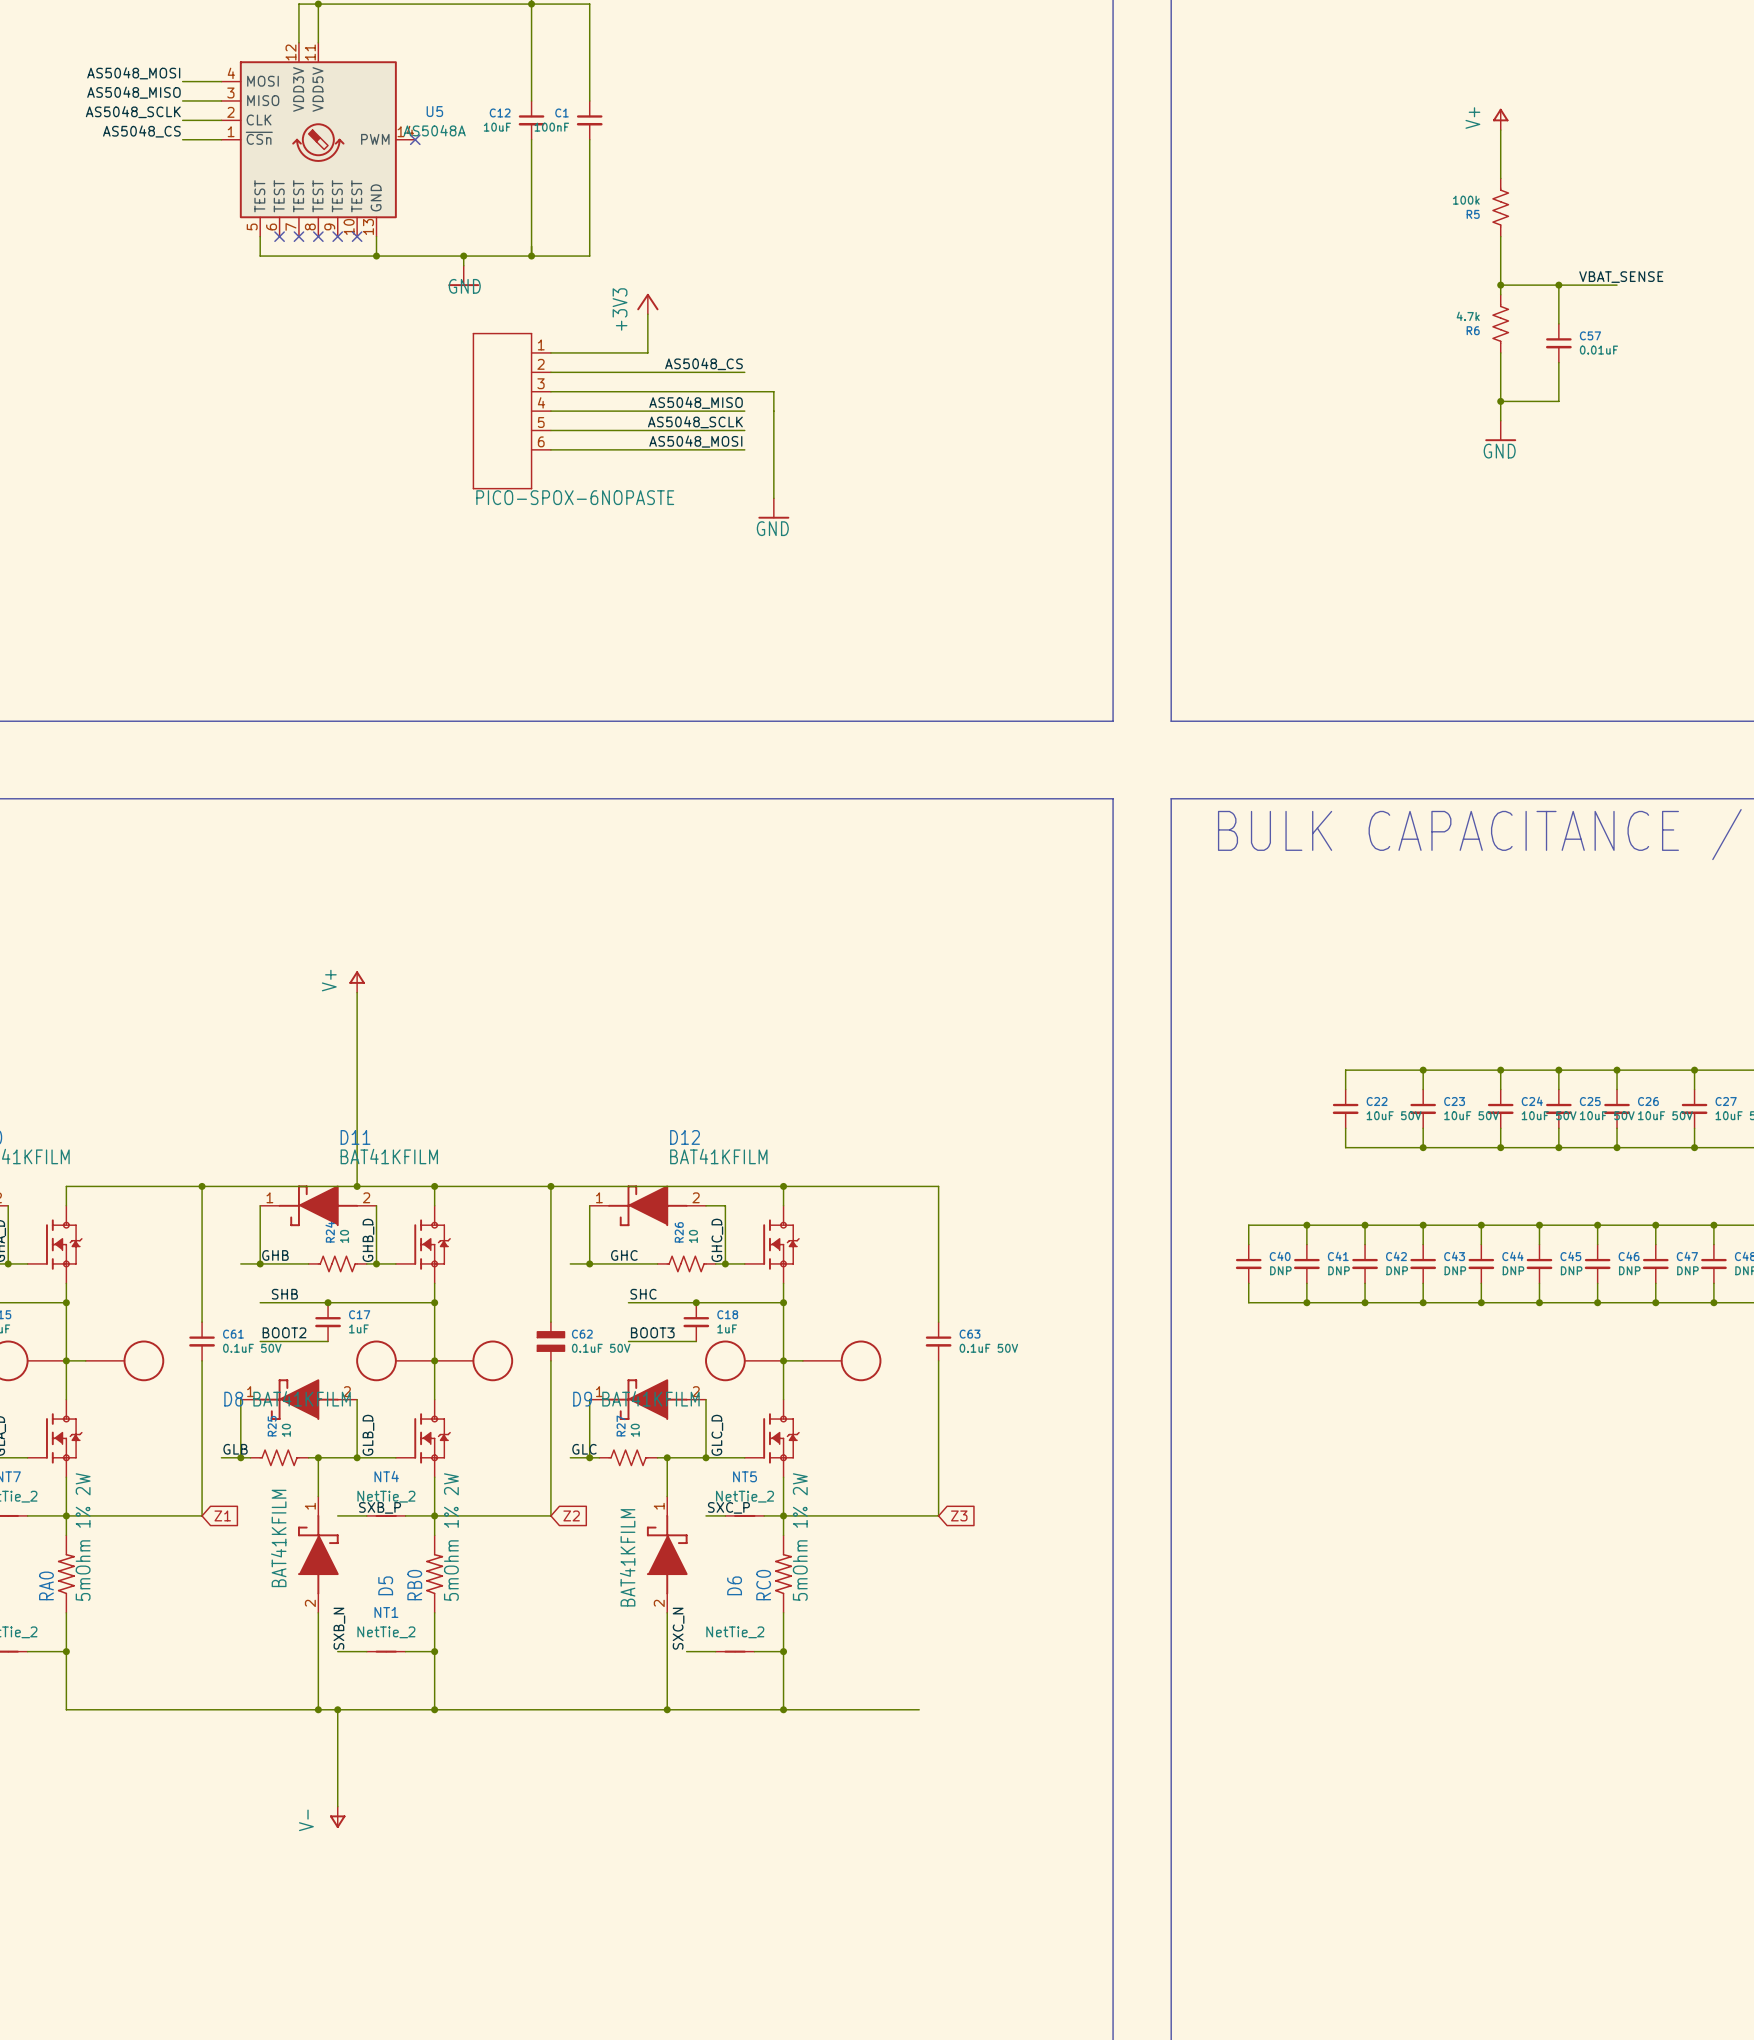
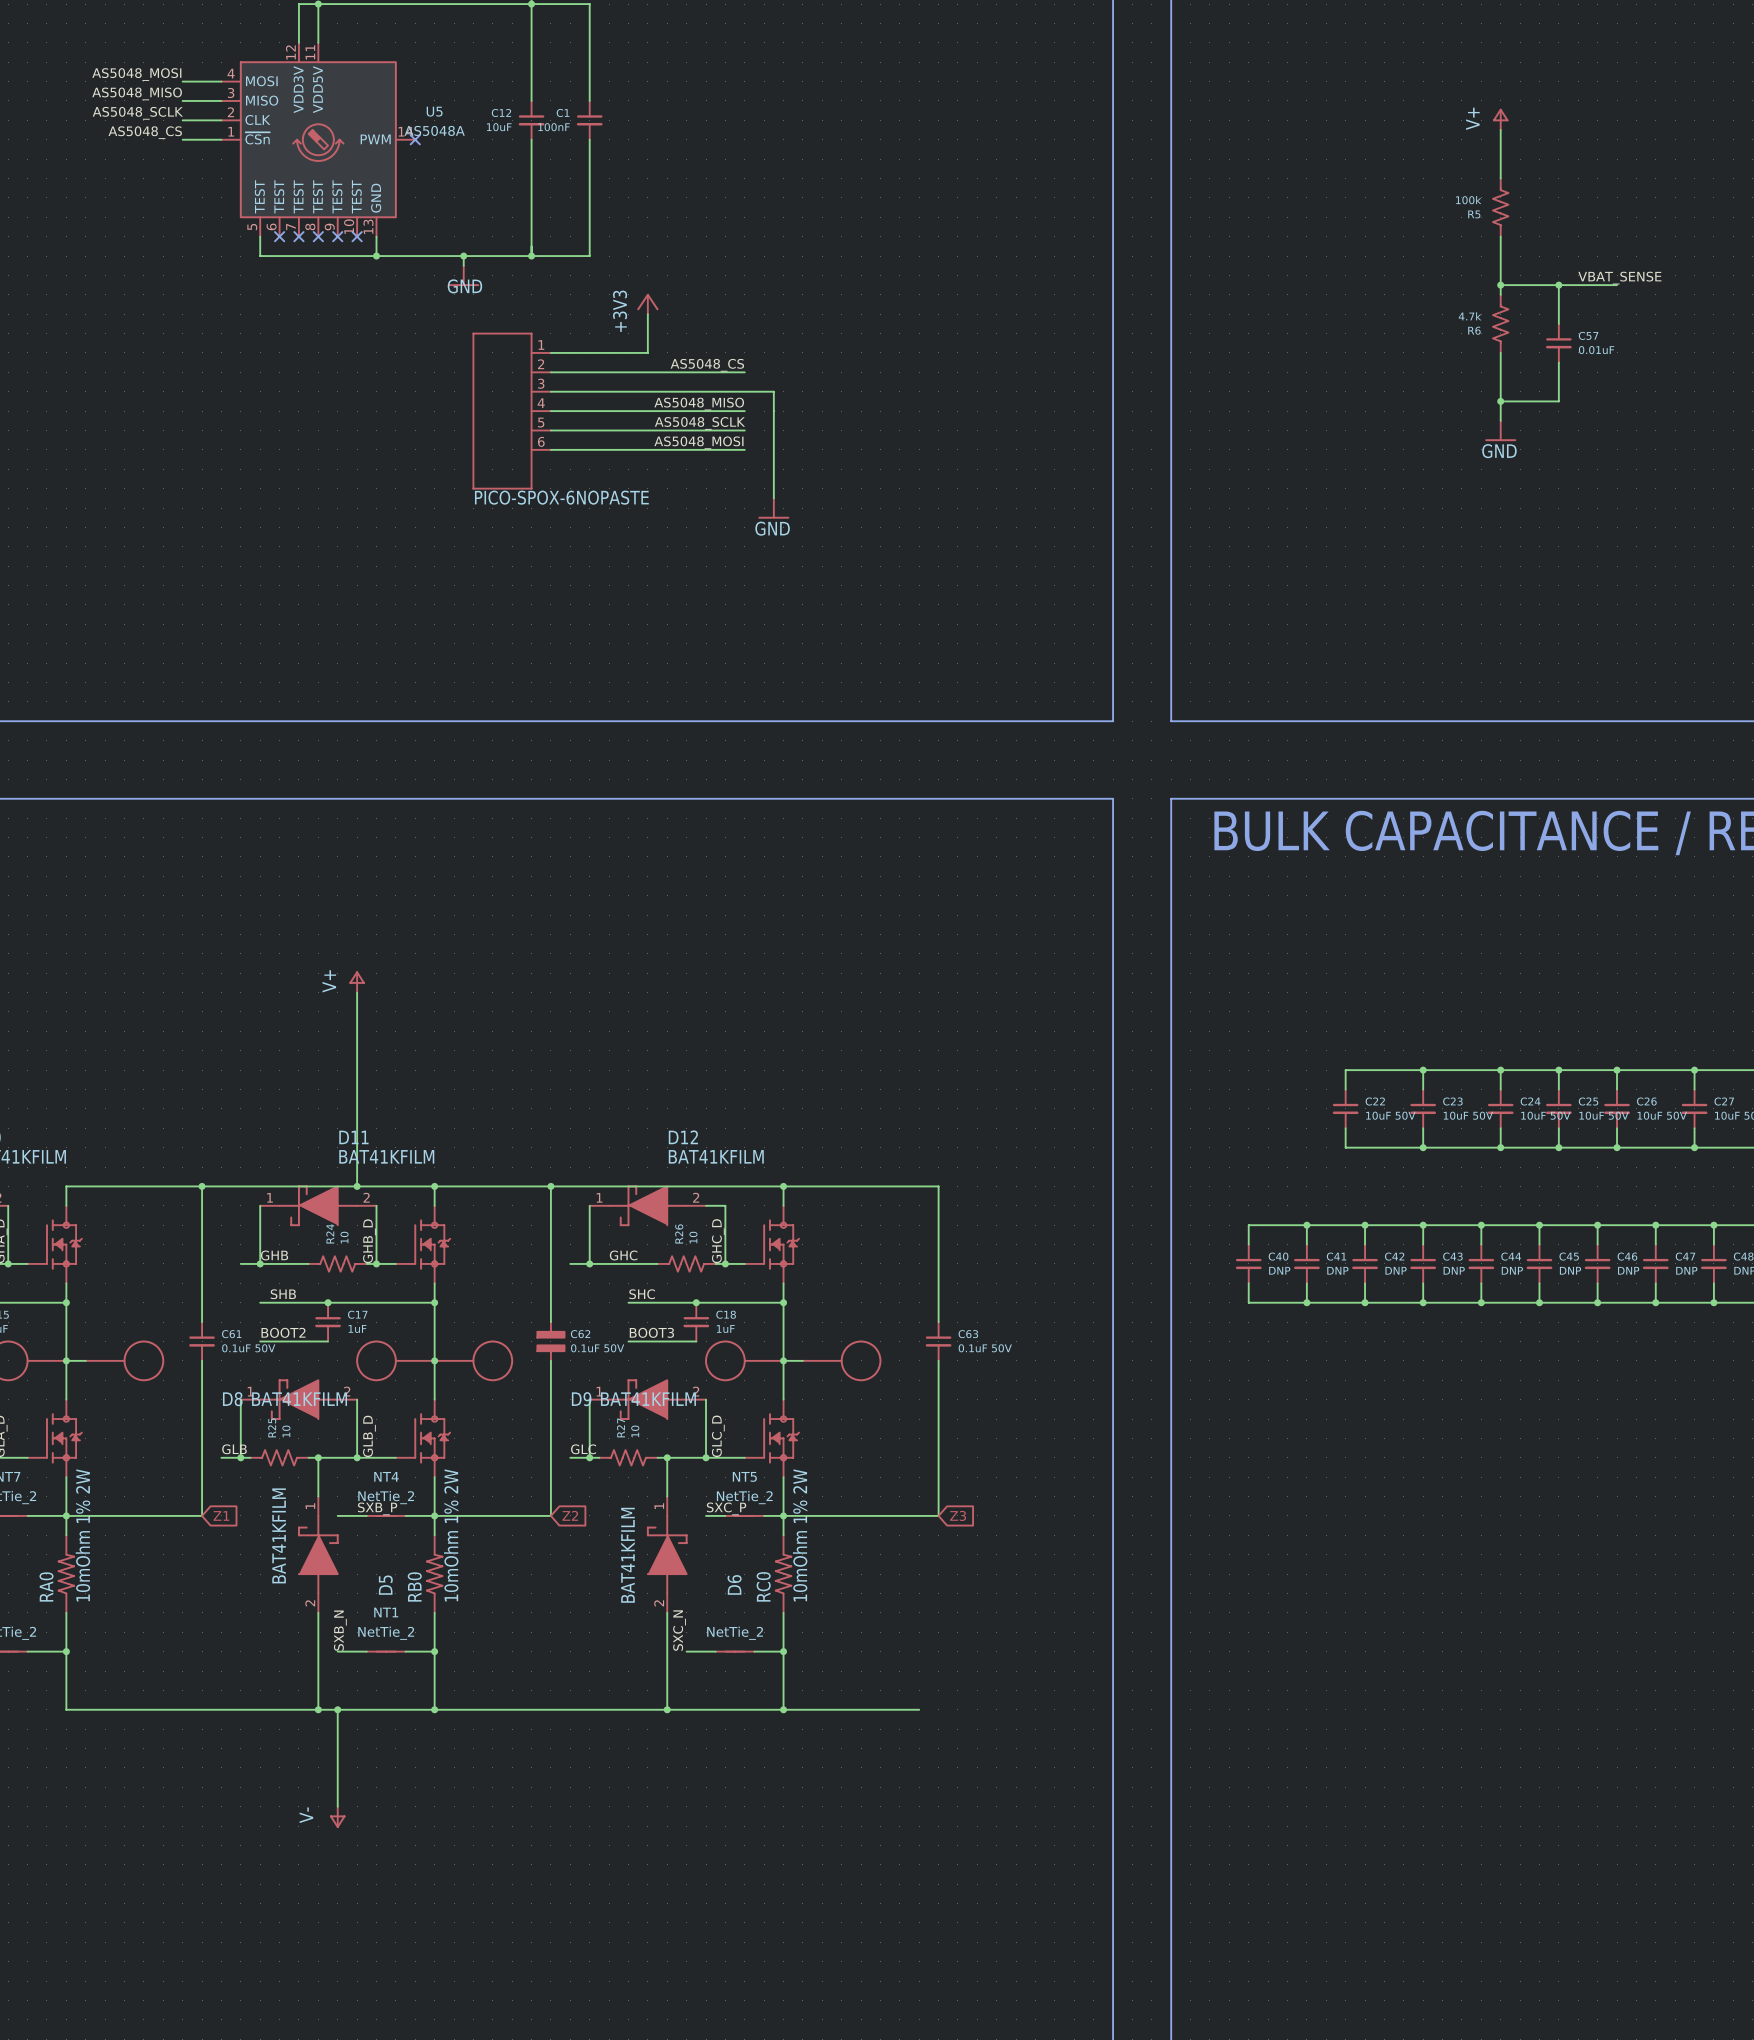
RA0 value: 5mOhm 1% 2W (83, 1537) -> 10mOhm 1% 2W (82, 1535)
RB0 value: 5mOhm 1% 2W (451, 1537) -> 10mOhm 1% 2W (451, 1535)
RC0 value: 5mOhm 1% 2W (800, 1537) -> 10mOhm 1% 2W (800, 1535)

